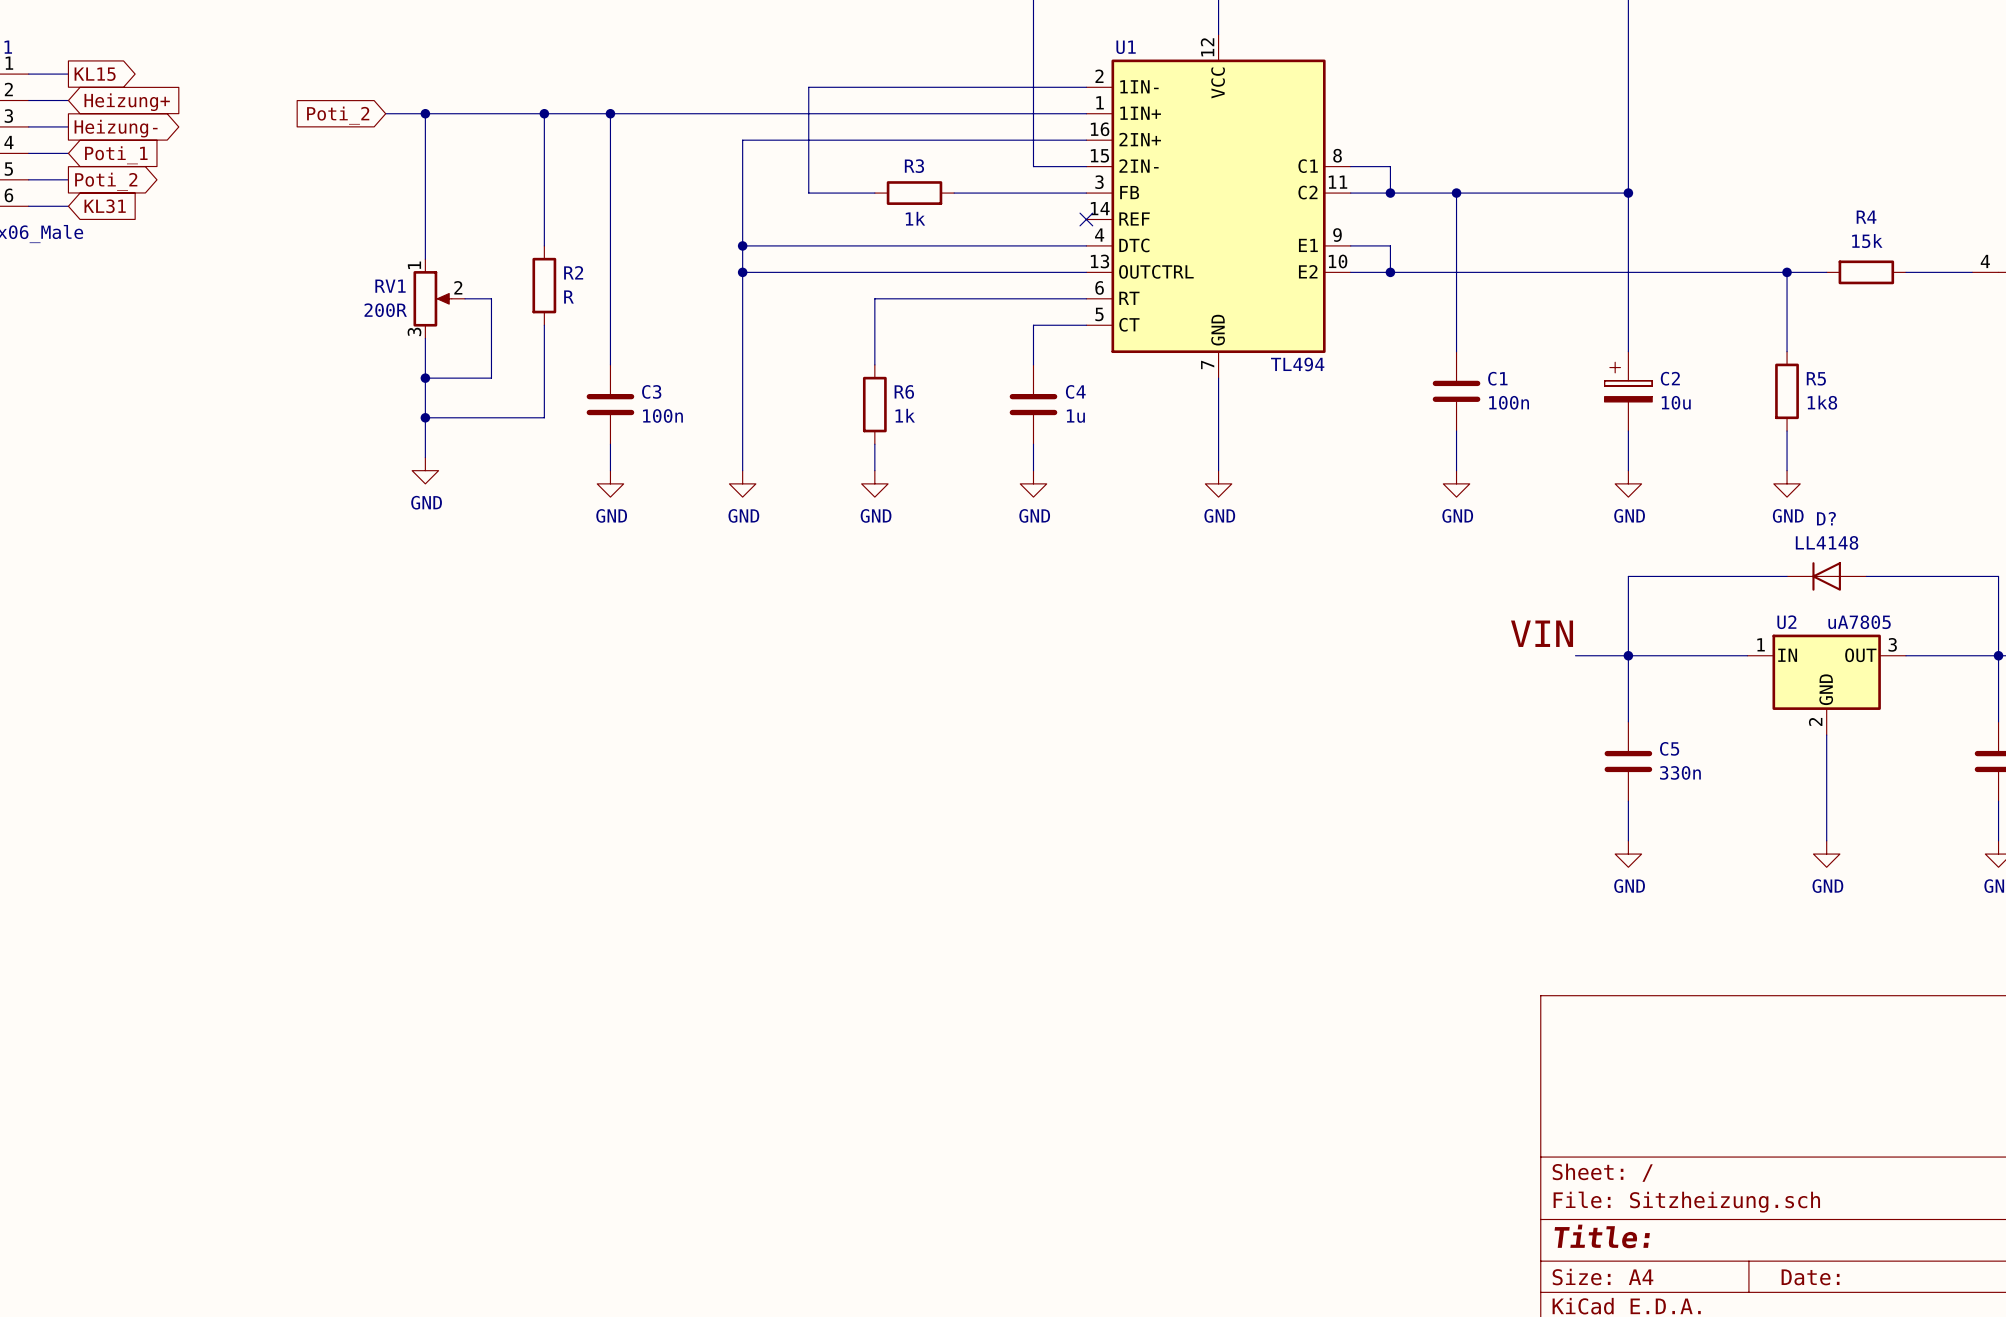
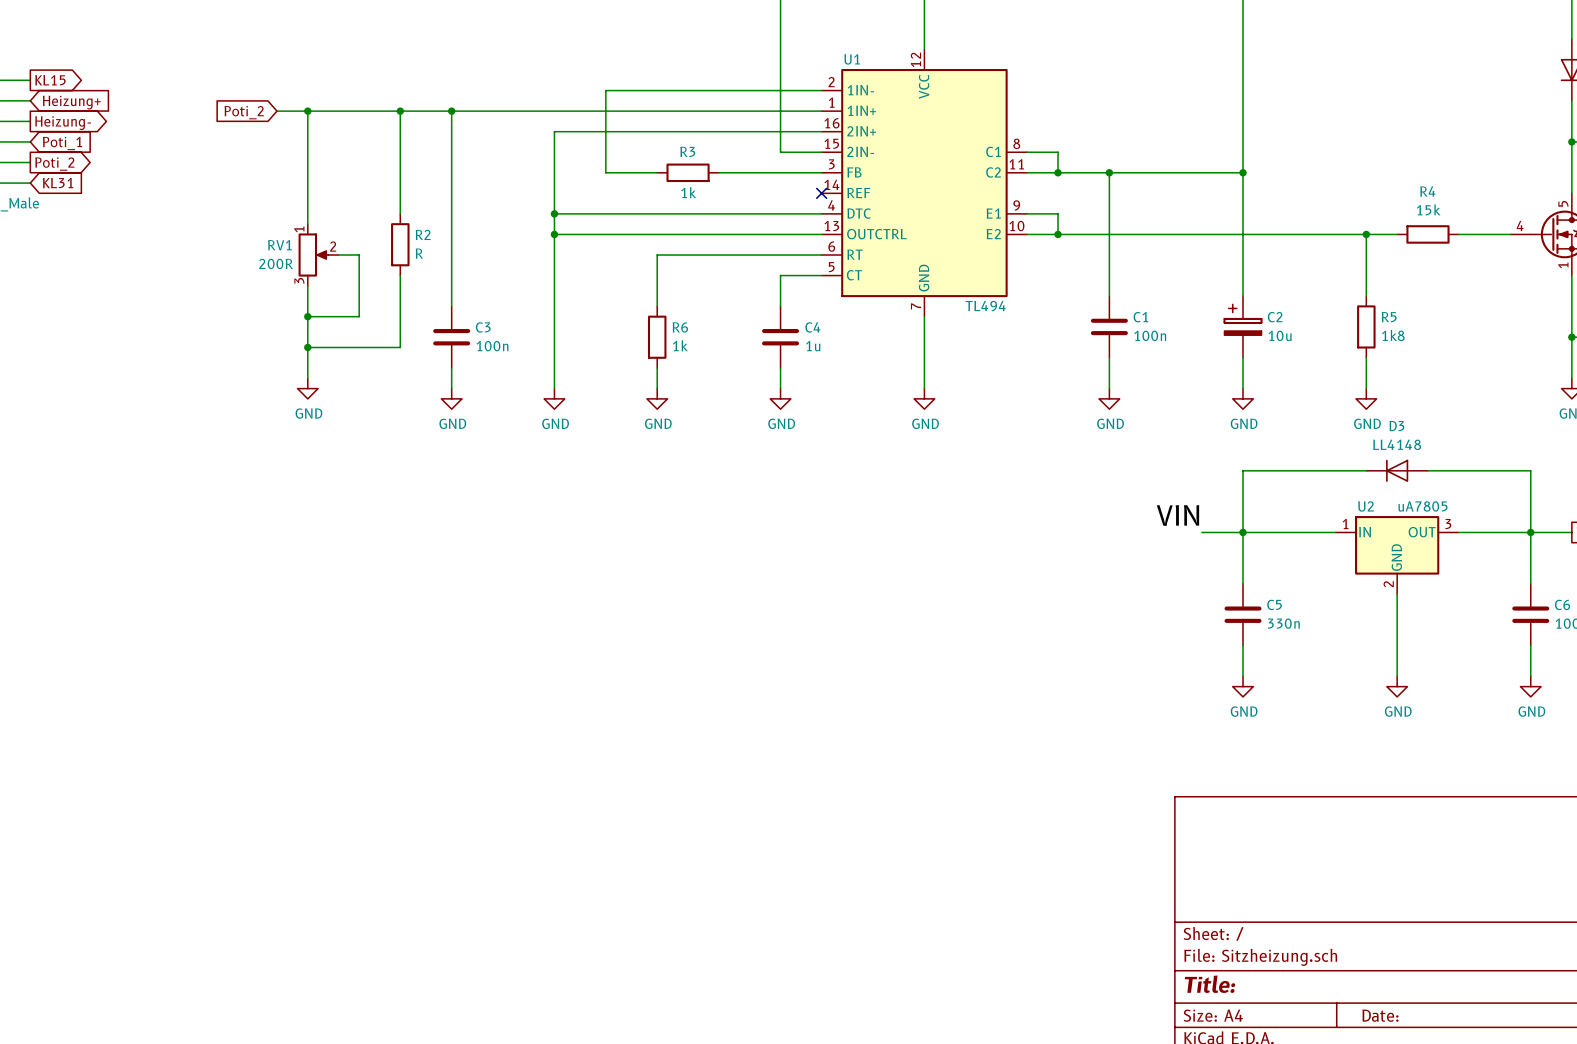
D? name: D? (1826, 518) -> D3 (1396, 426)

